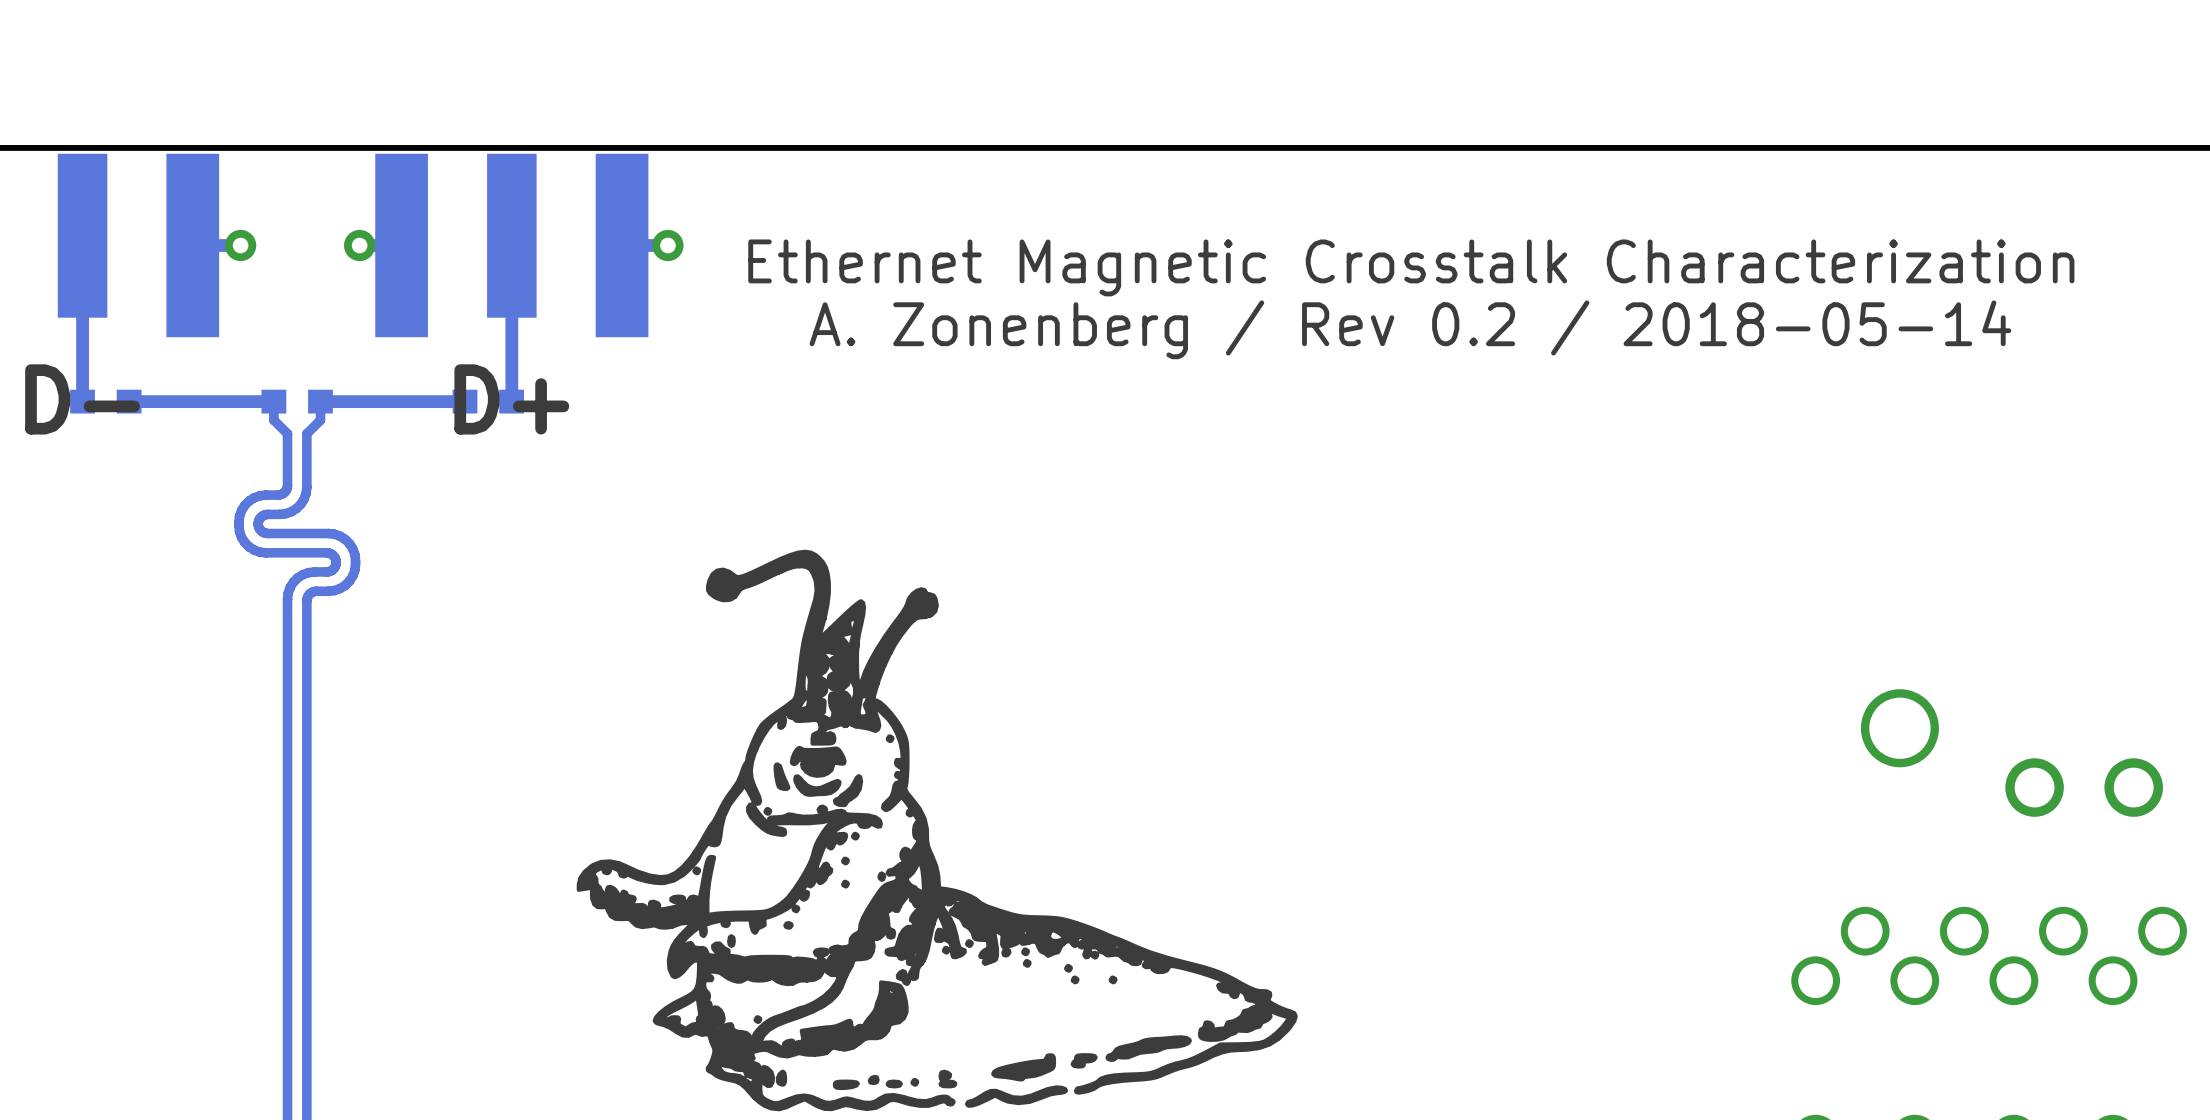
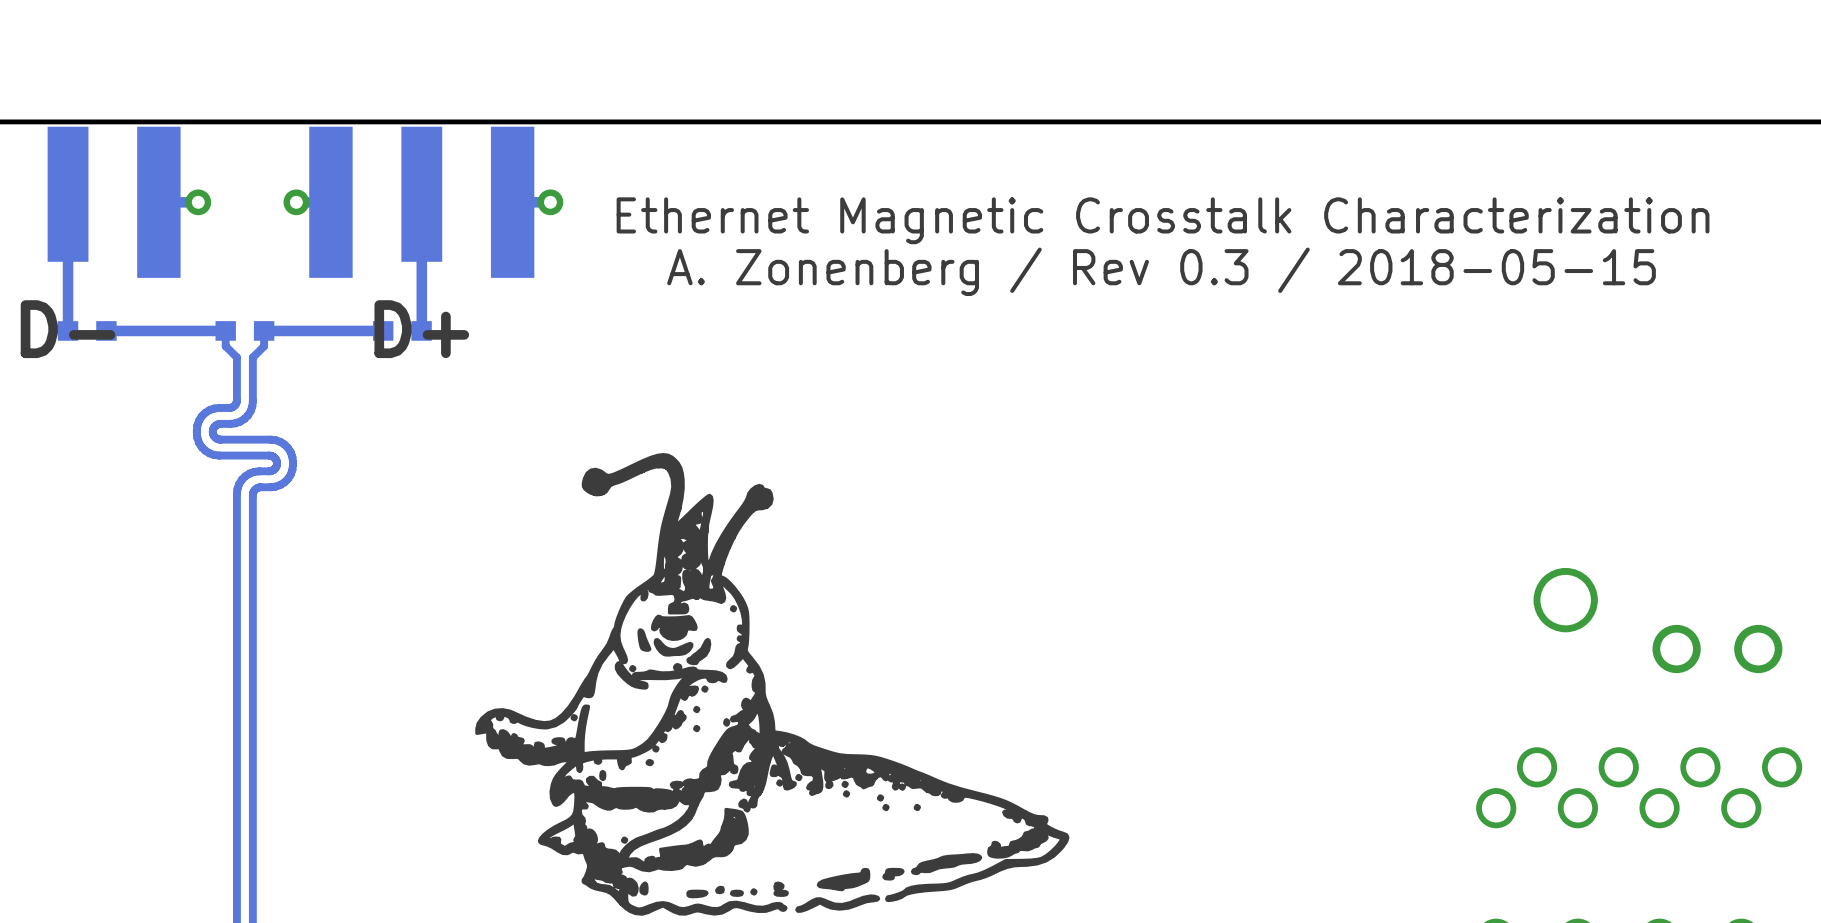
text: A. Zonenberg / Rev 0.2 / 2018-05-14 (1410, 329) -> A. Zonenberg / Rev 0.3 / 2018-05-15 (1161, 271)

